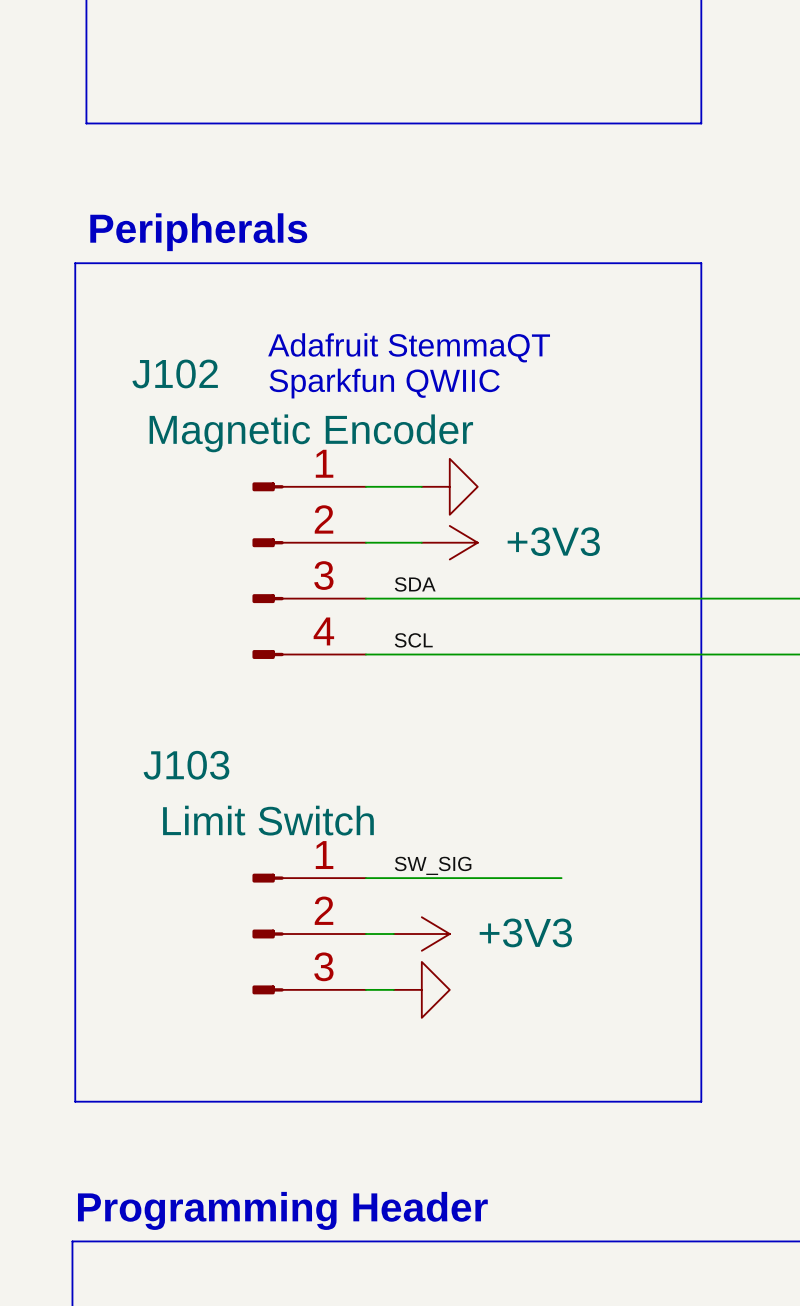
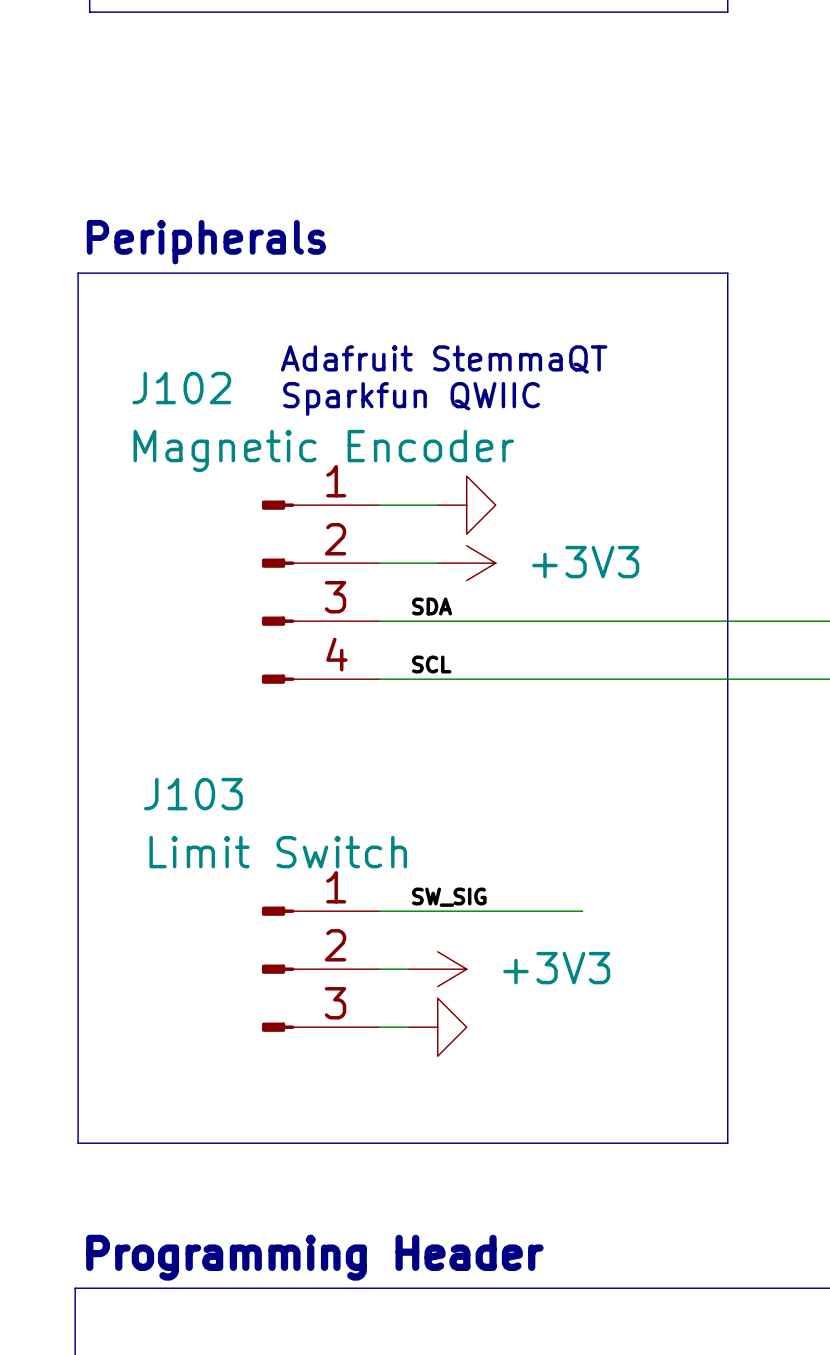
line: (86, 11) (86, 123) (701, 123) (701, 11) -> (89, 12) (727, 12)

